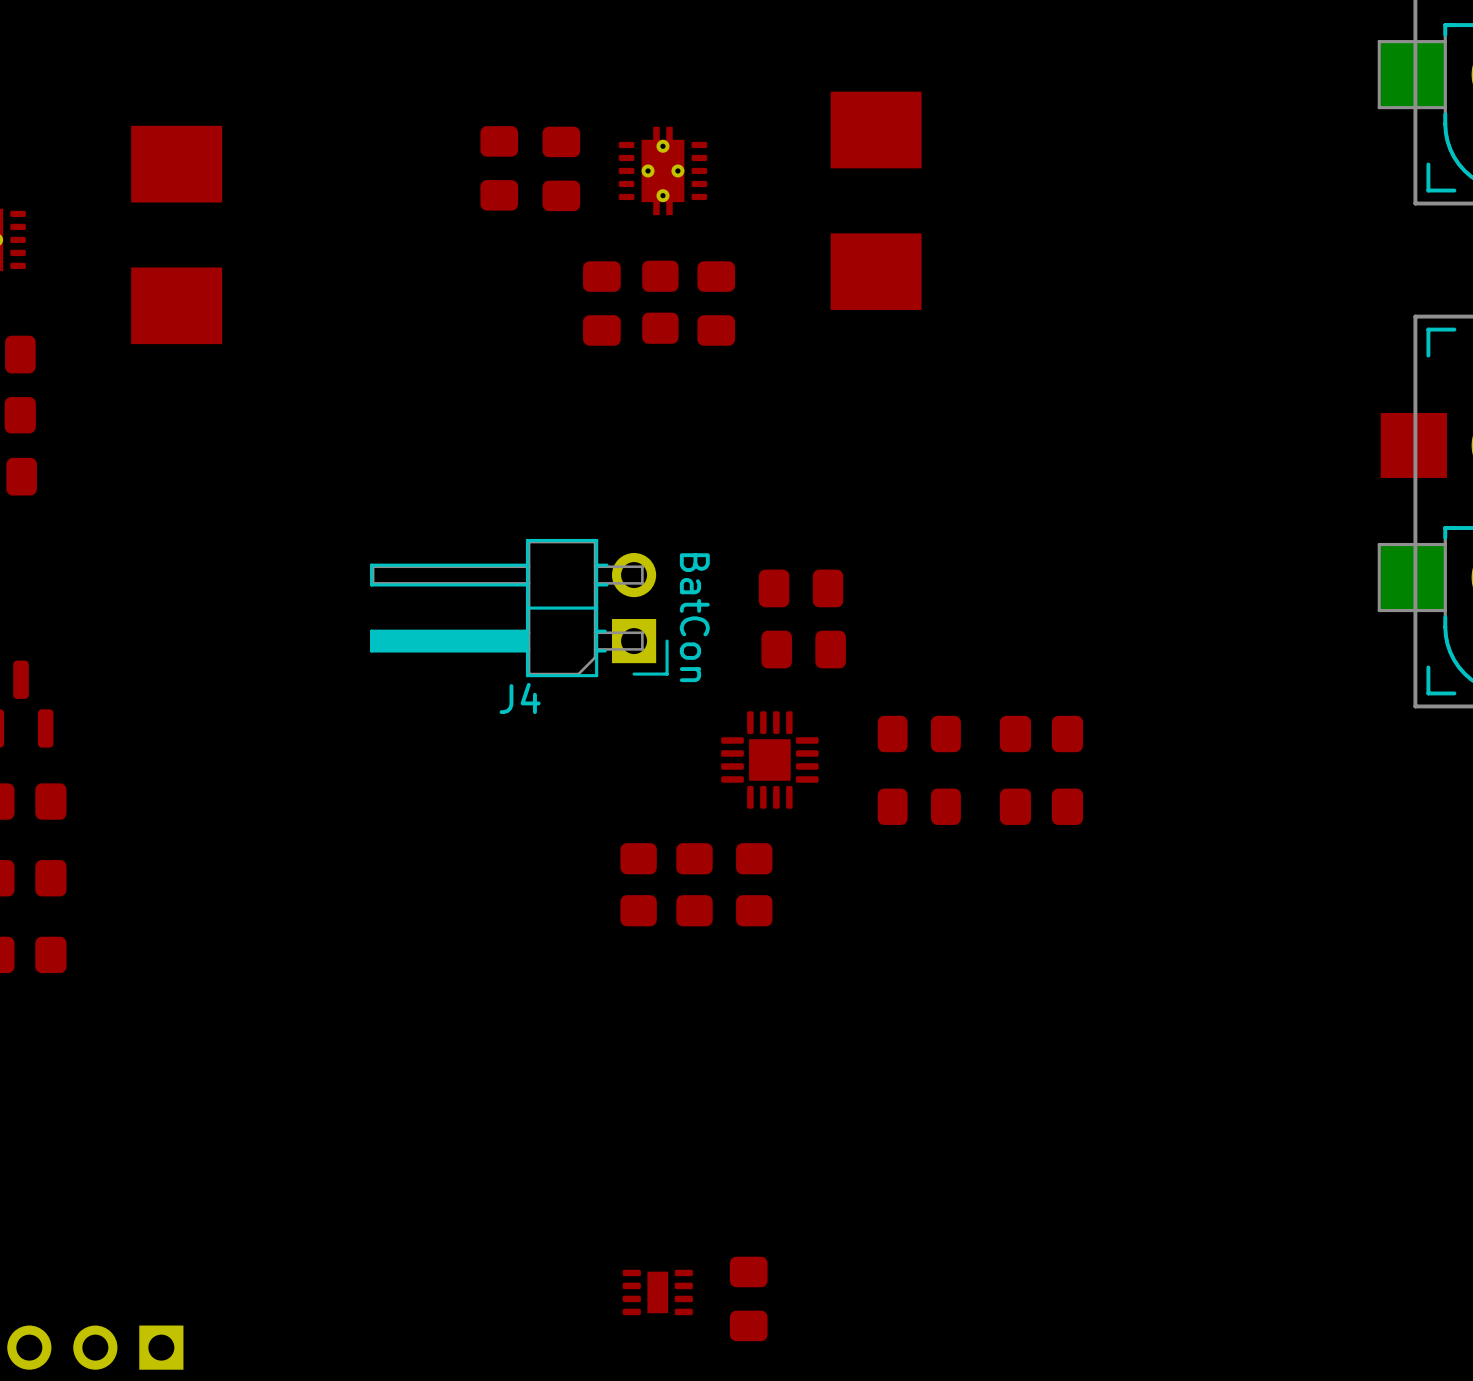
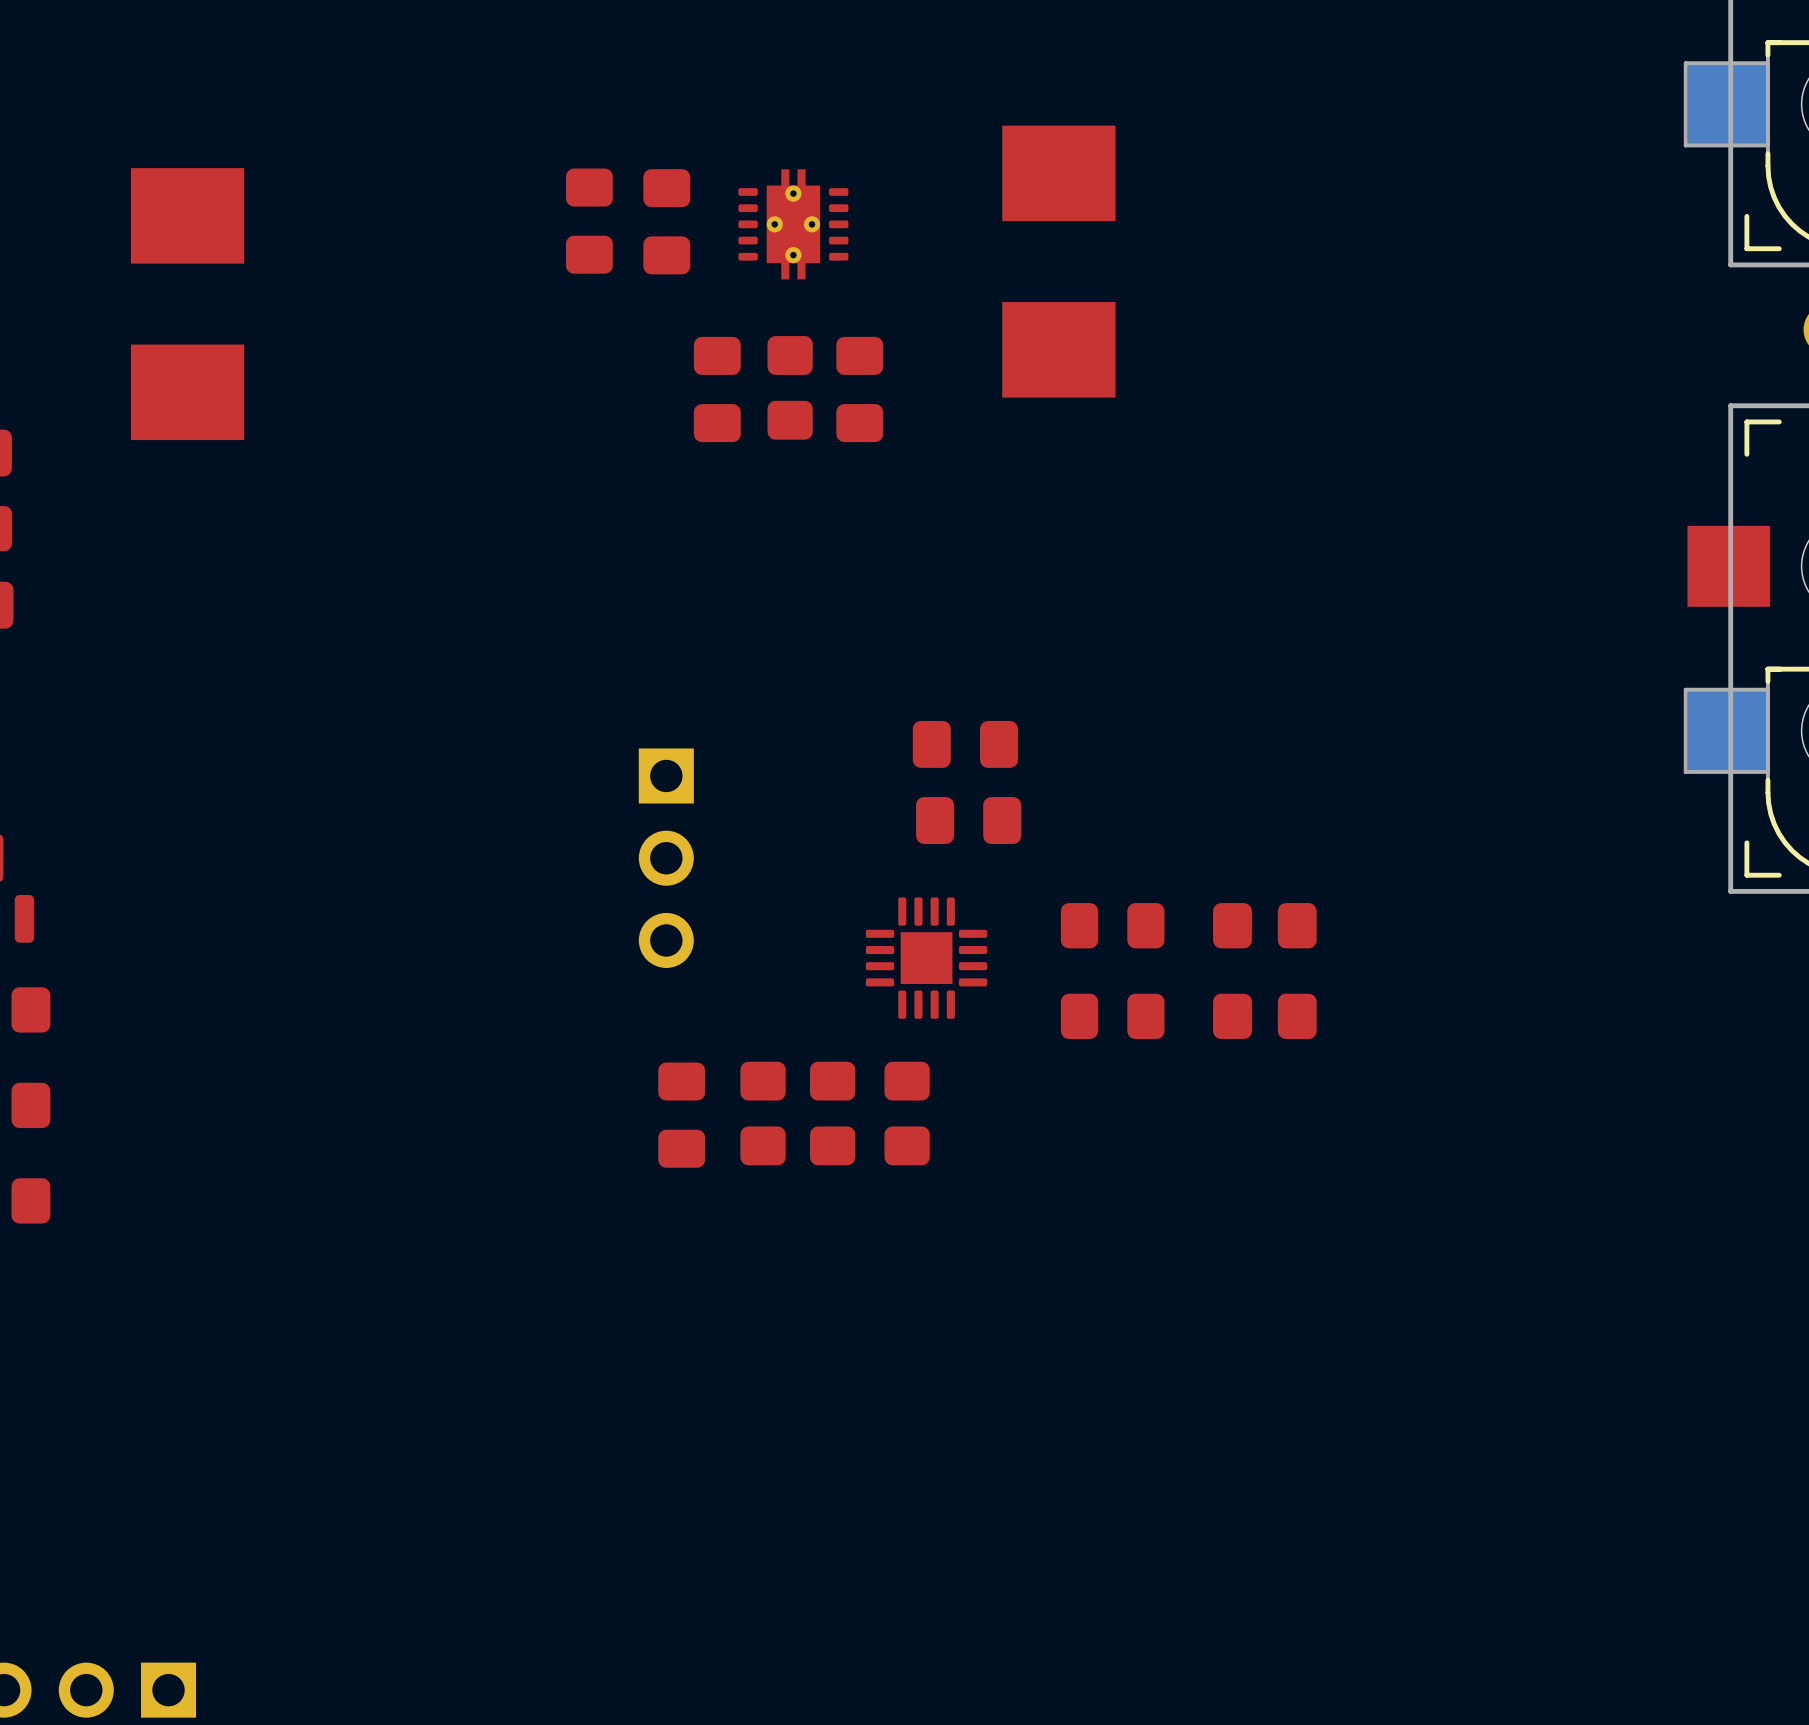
J4: BatCon (519, 608) -> none
part: none -> (666, 858)
part: (657, 1292) -> none
part position: (748, 1298) -> (681, 1115)

